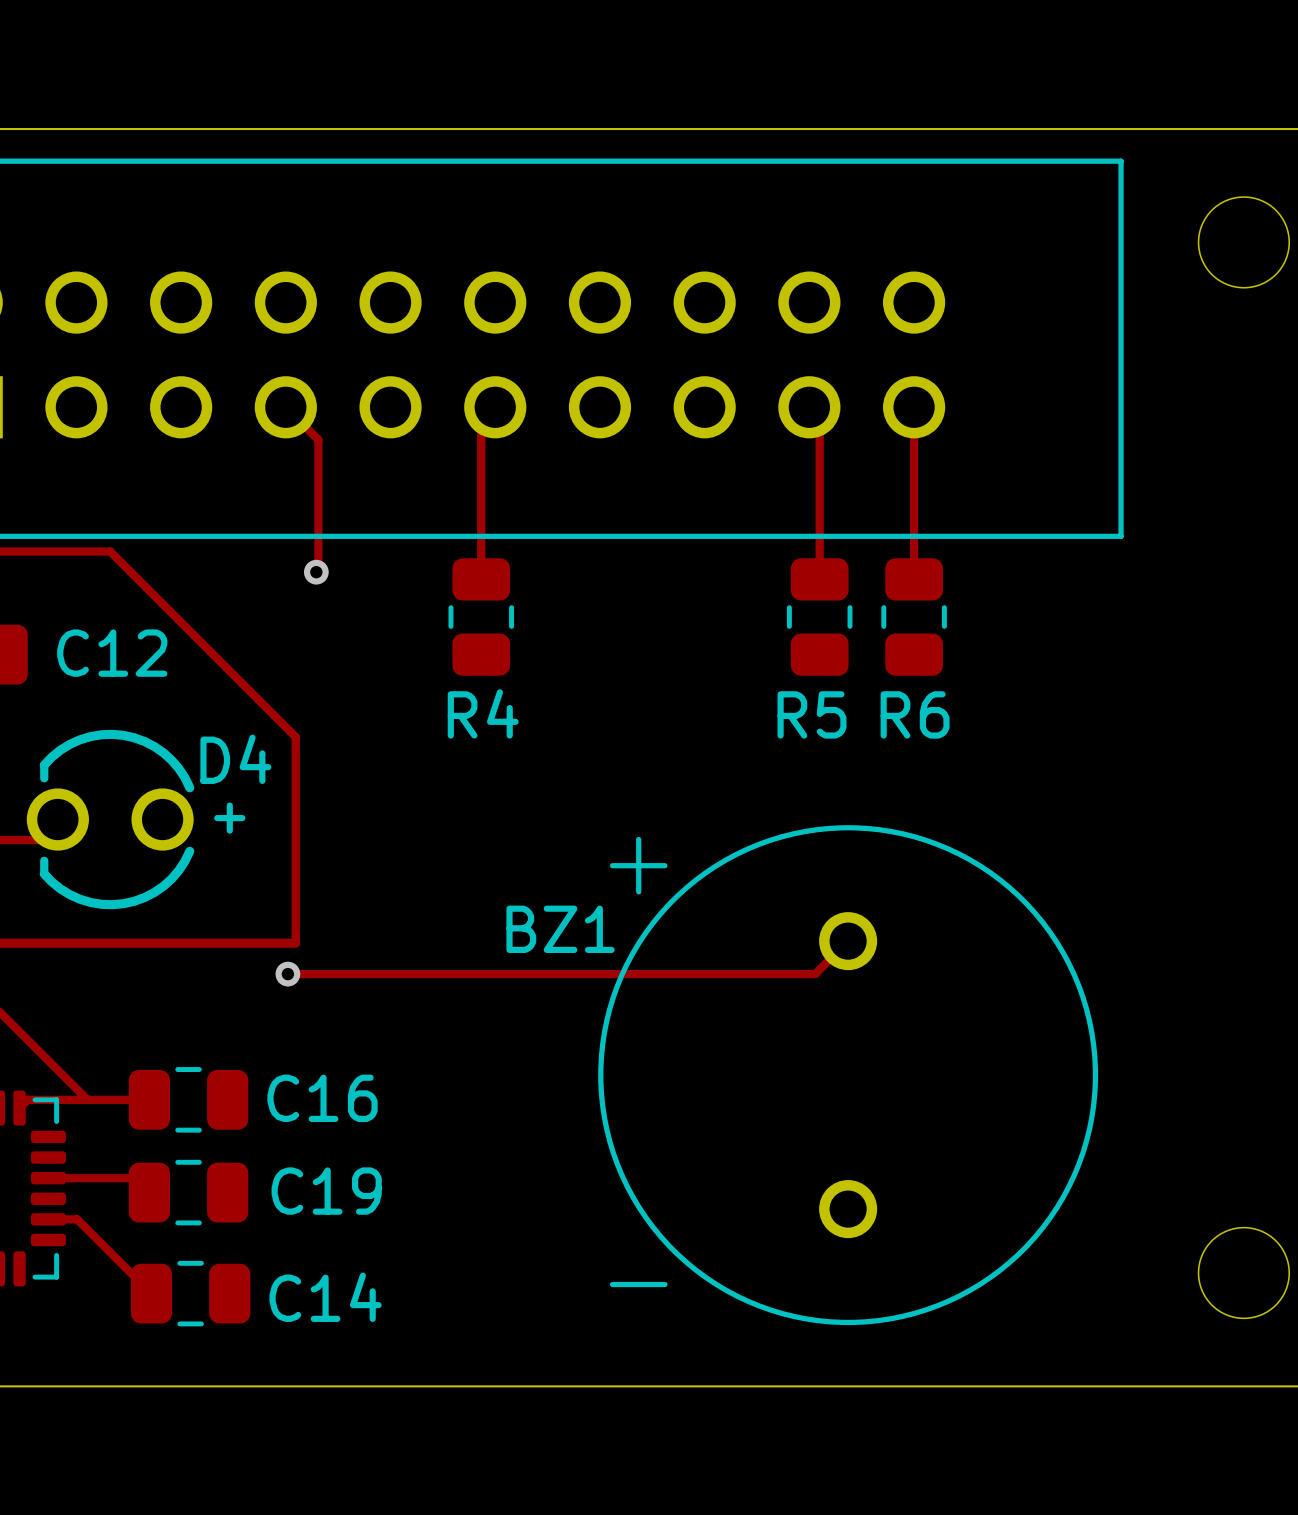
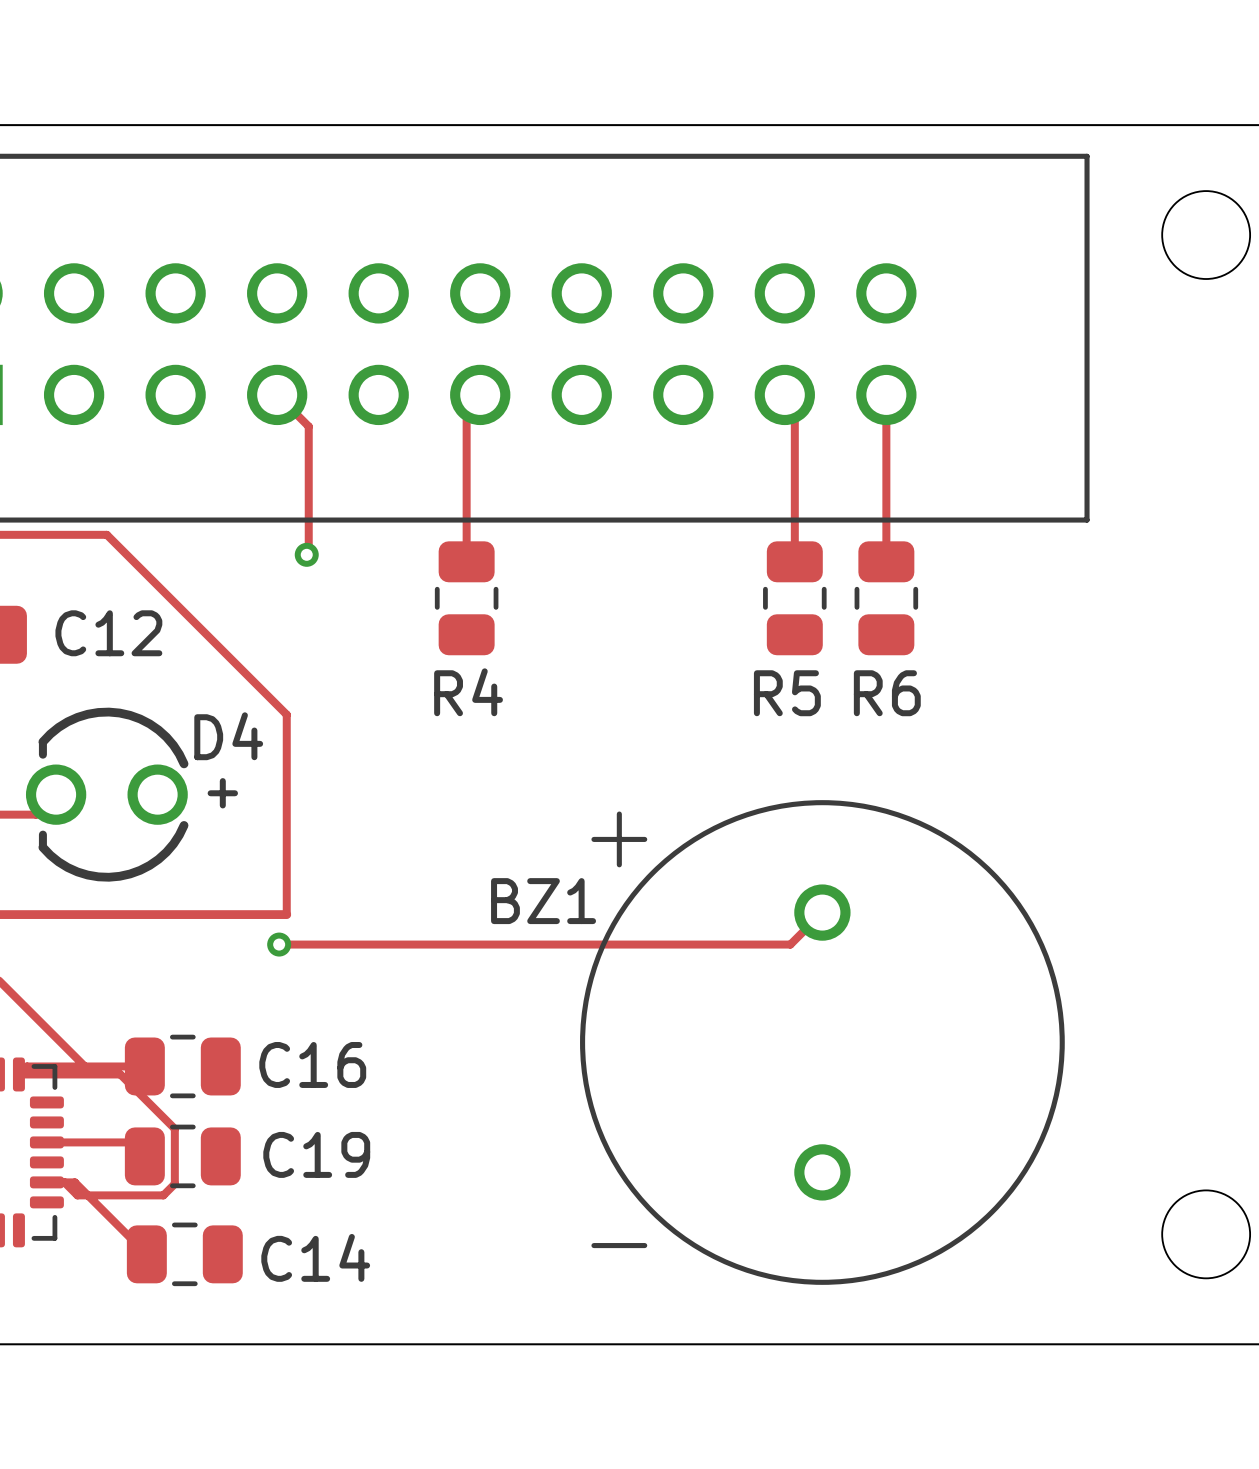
track: none -> (18, 1074) (120, 1074) (174, 1128) (174, 1183) (163, 1195) (77, 1195) (64, 1182)

